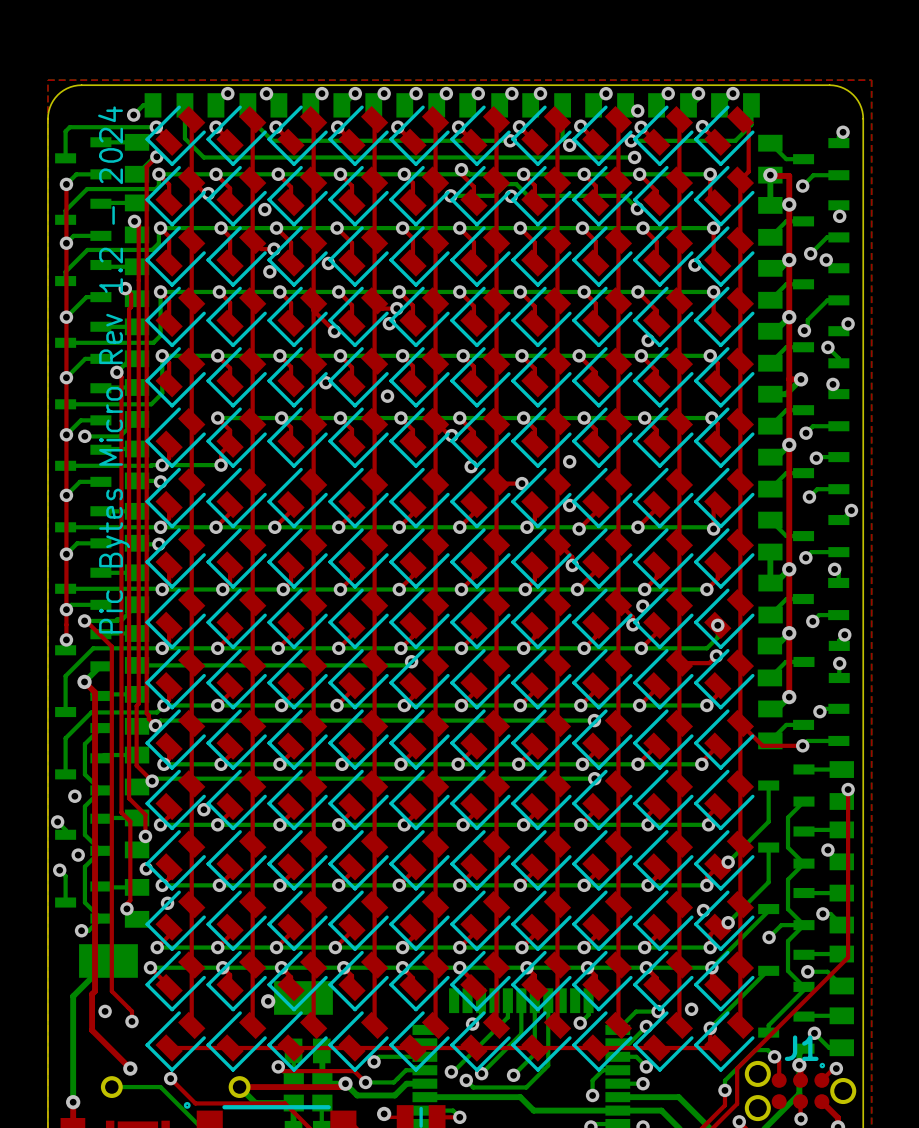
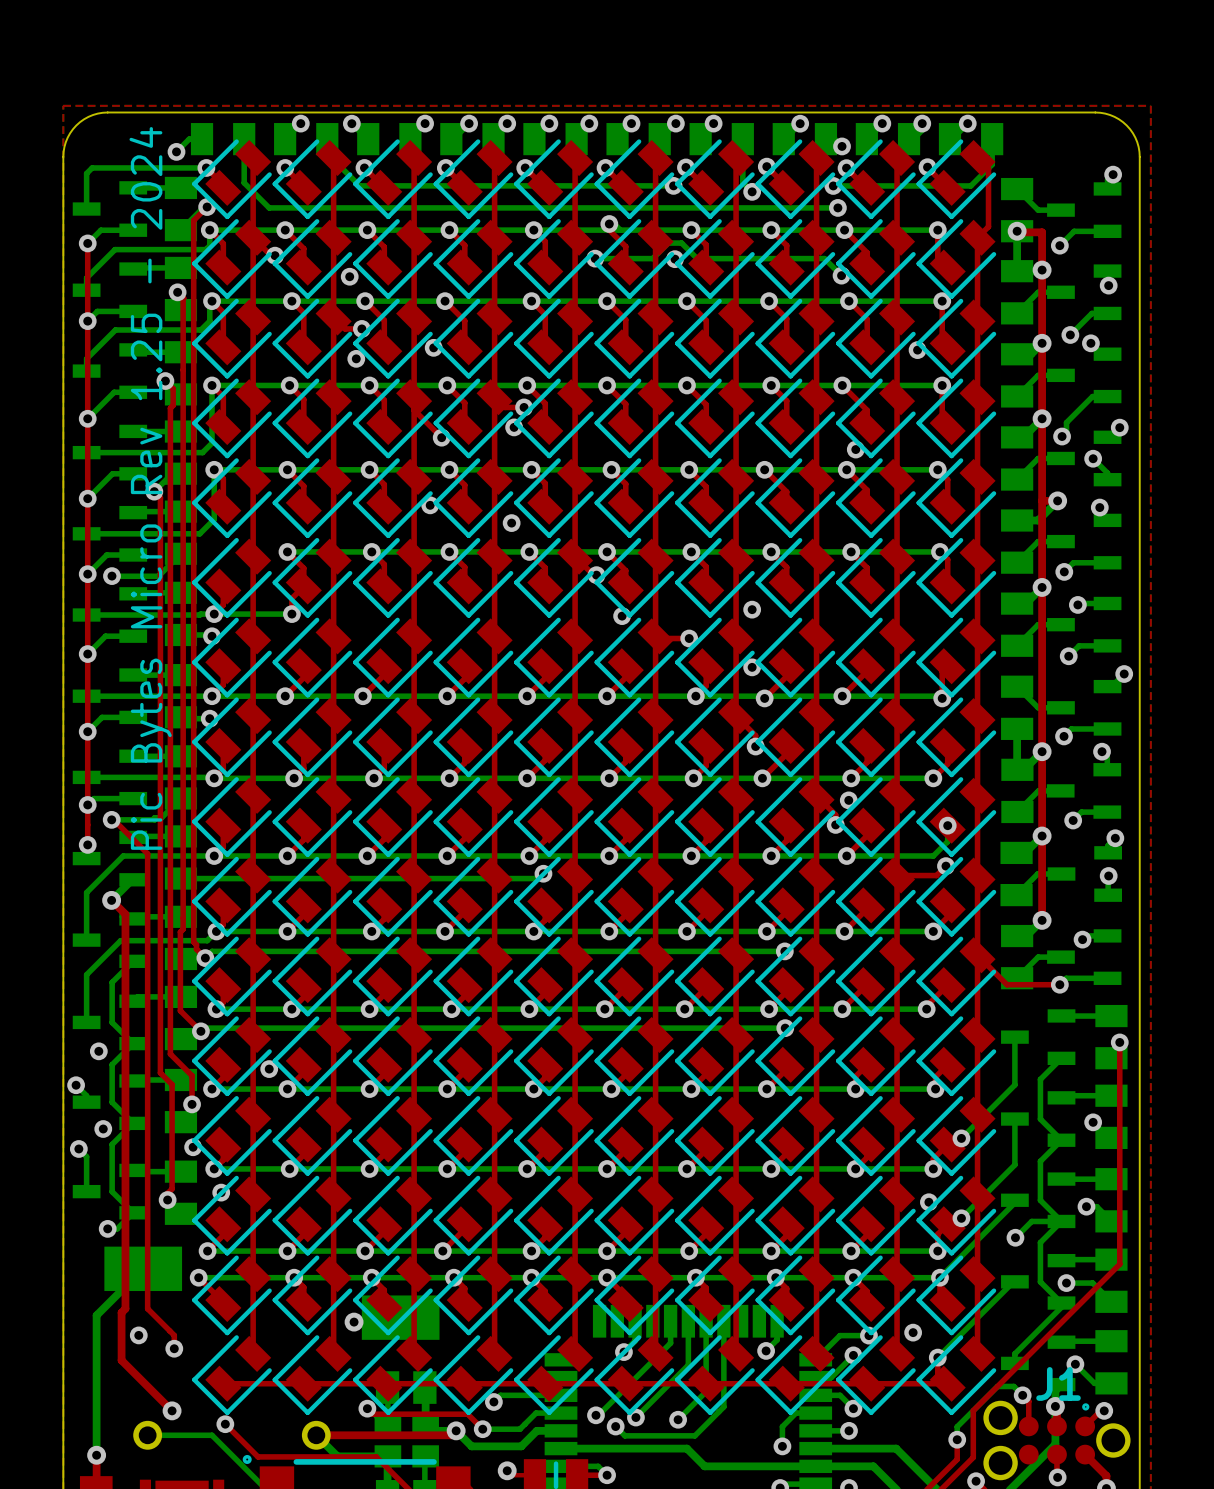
text: Pic Bytes Micro Rev 1.2 - 2024 (114, 369) -> Pic Bytes Micro Rev 1.25 - 2024 (150, 488)

